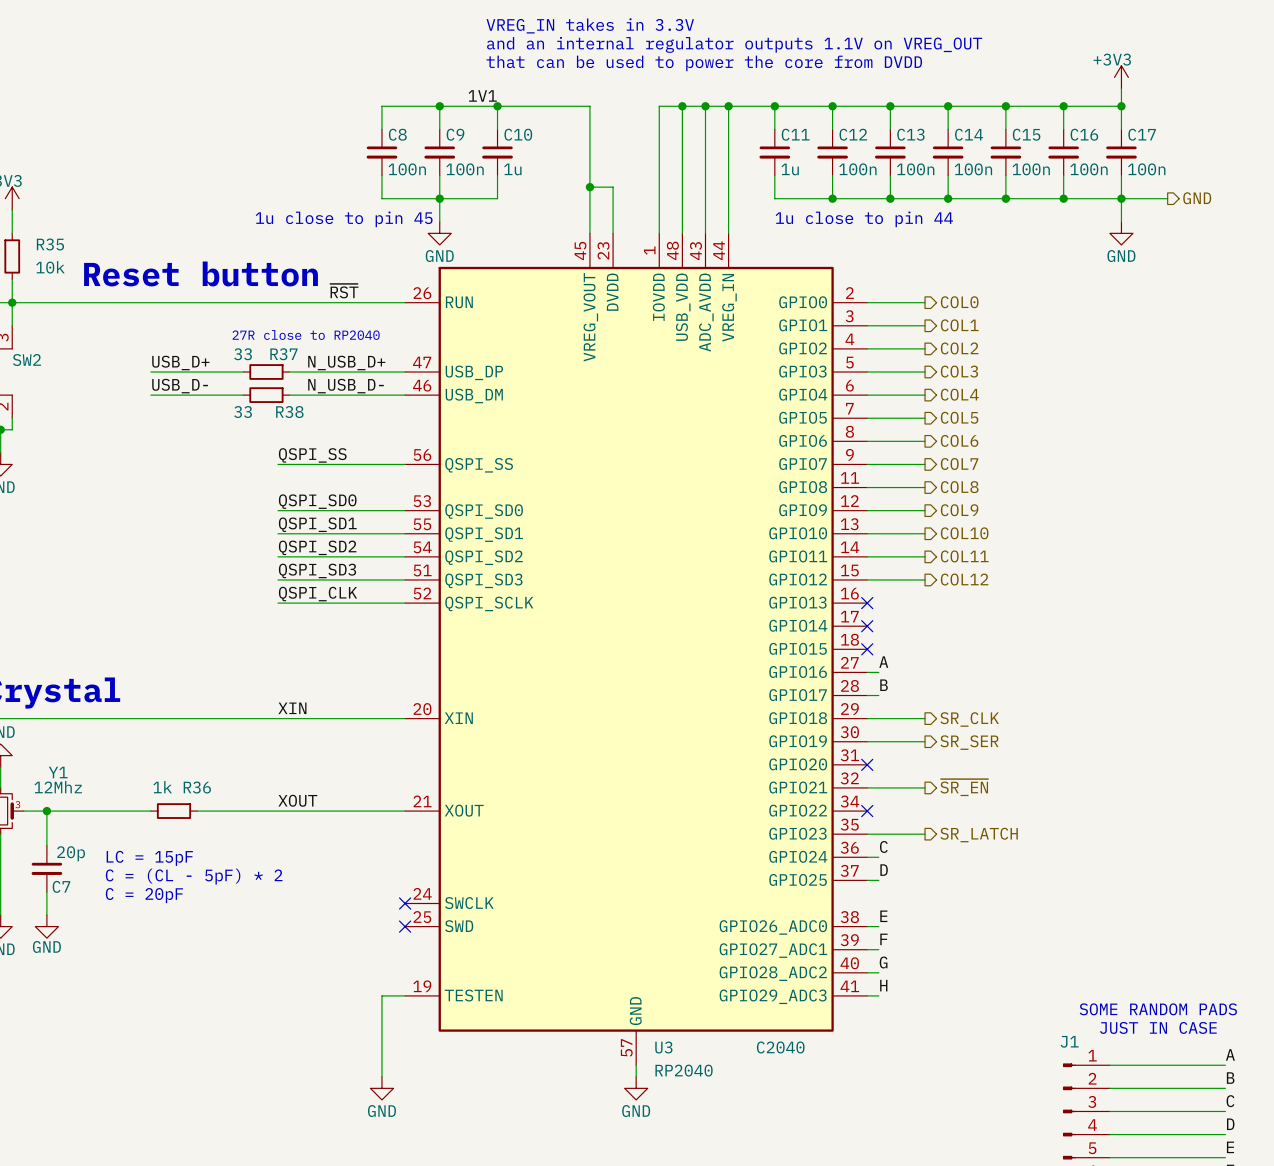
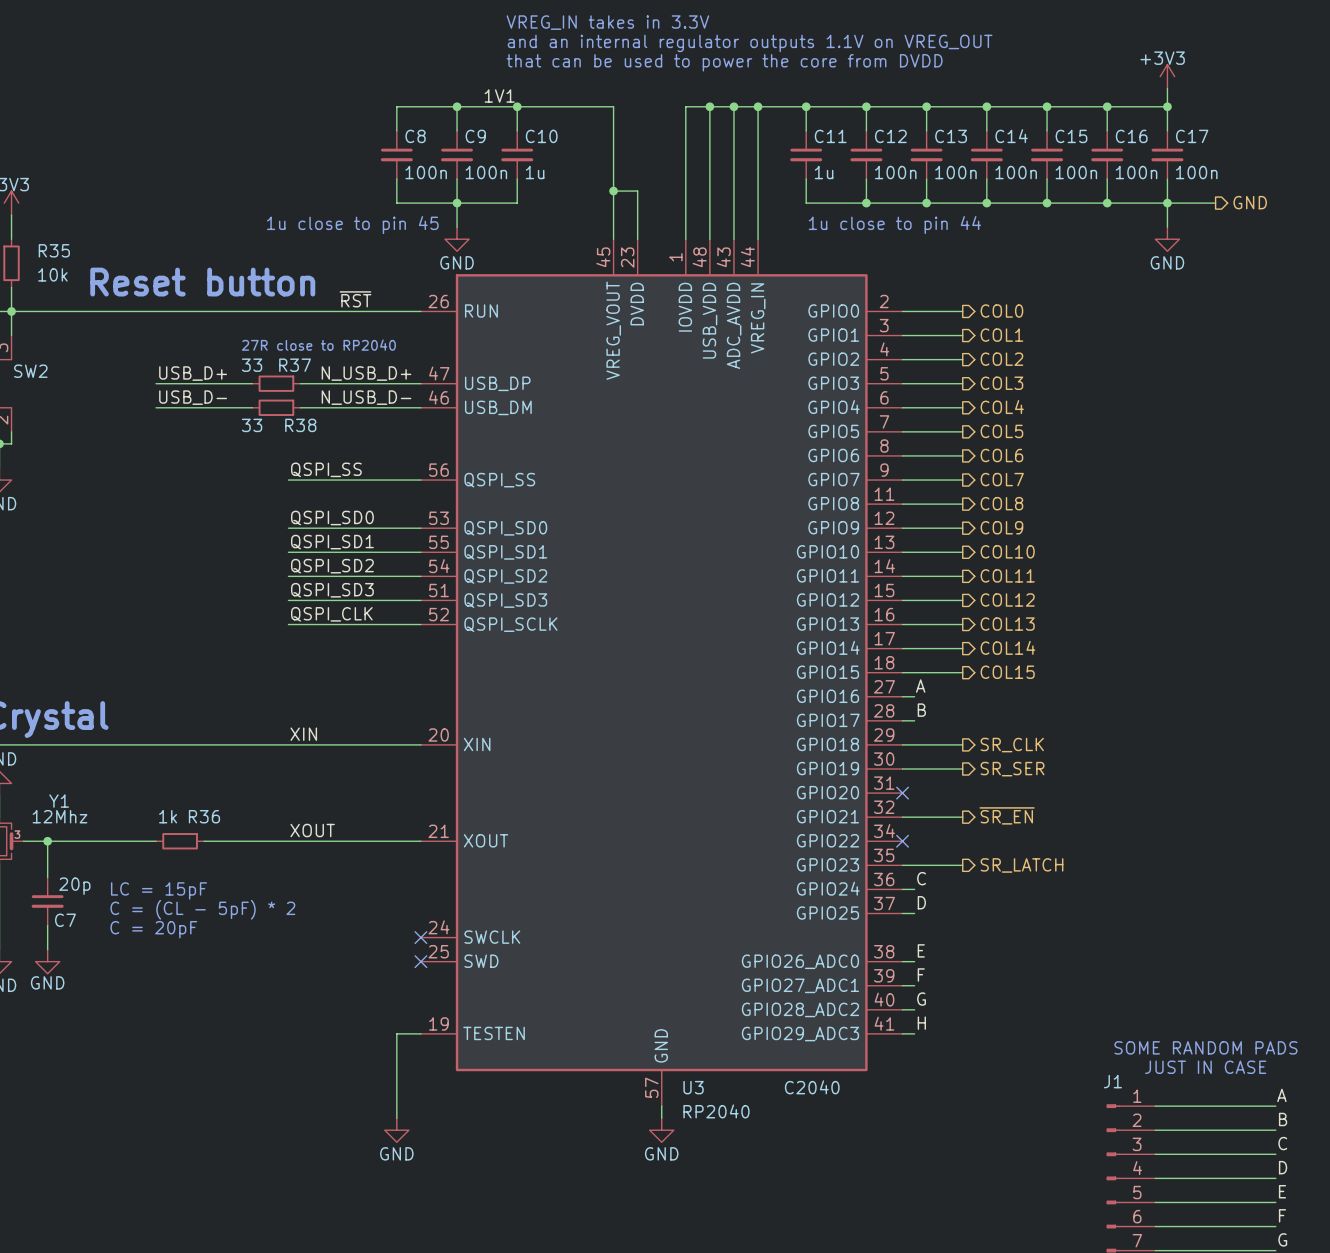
hierarchical label: none -> COL13 (1007, 624)
wire: none -> (902, 624) (962, 624)
no-connect mark: (867, 603) -> none
hierarchical label: none -> COL14 (1007, 647)
wire: none -> (902, 648) (962, 648)
no-connect mark: (867, 626) -> none
hierarchical label: none -> COL15 (1007, 672)
wire: none -> (902, 672) (962, 672)
no-connect mark: (867, 649) -> none

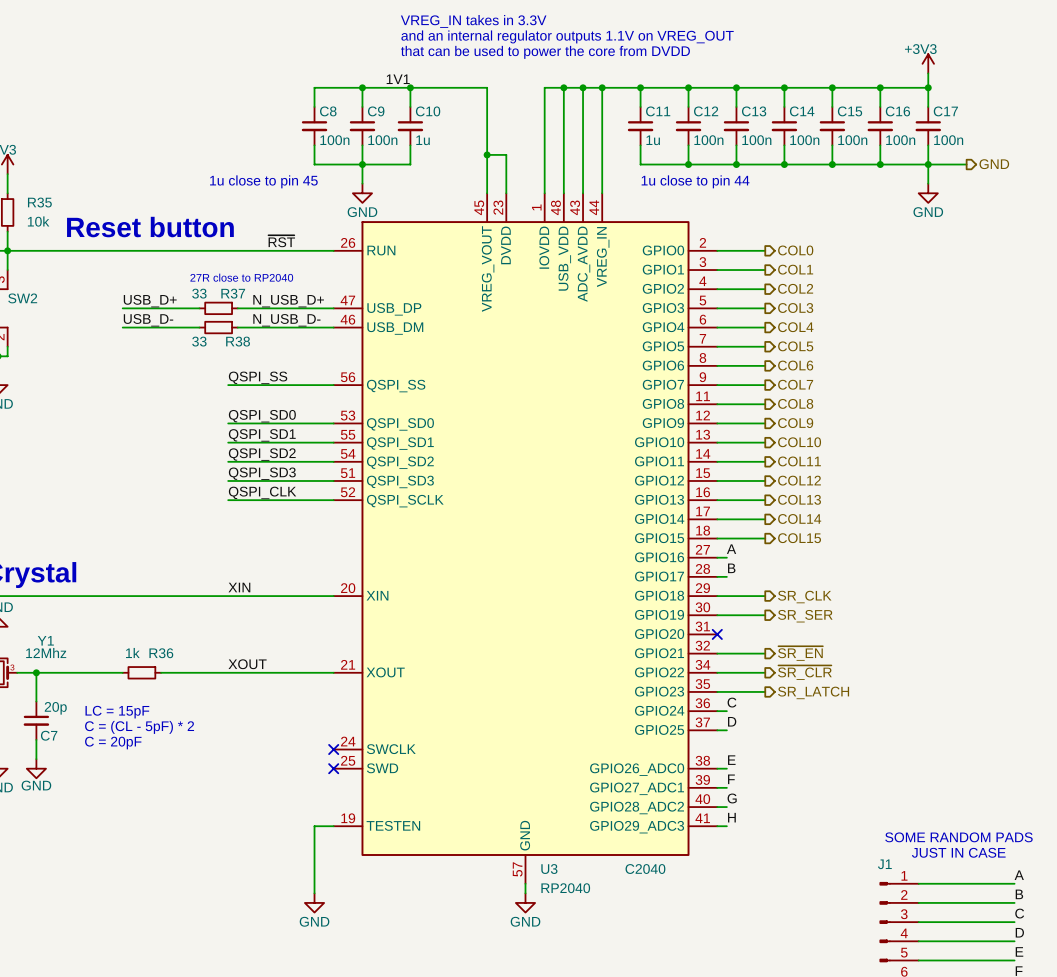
hierarchical label: none -> ~{SR_CLR} (804, 672)
wire: none -> (717, 672) (765, 672)
no-connect mark: (902, 841) -> none

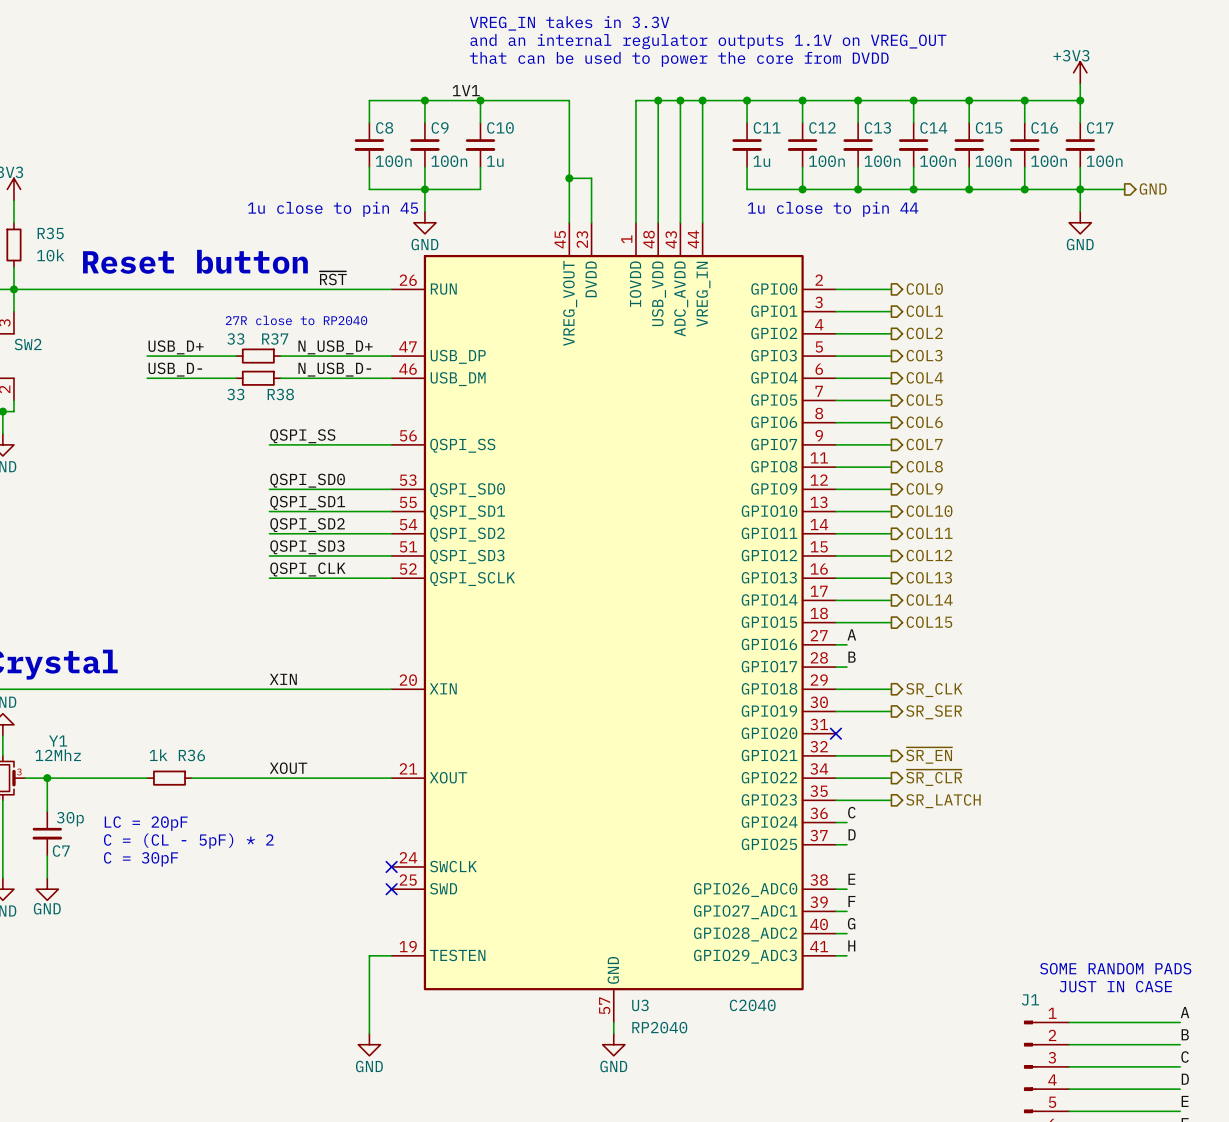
C7 value: 20p (55, 708) -> 30p (70, 819)
text: LC = 15pF (117, 712) -> LC = 20pF (146, 823)
text: C = 20pF (113, 743) -> C = 30pF (141, 859)

